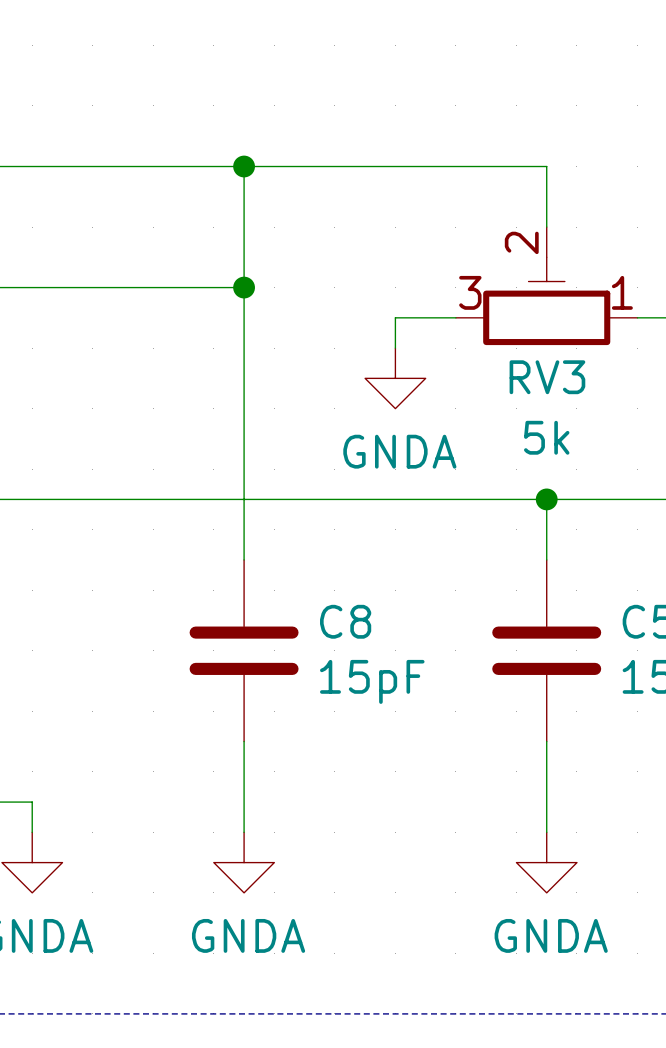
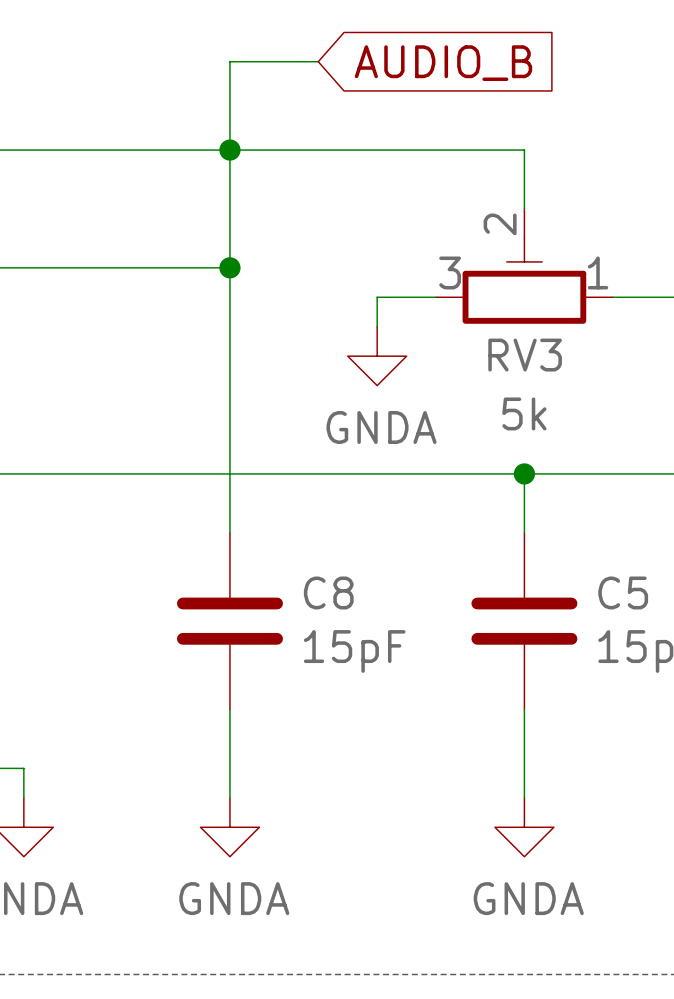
wire: none -> (318, 61) (229, 61) (229, 150)
global label: none -> AUDIO_B (443, 63)

